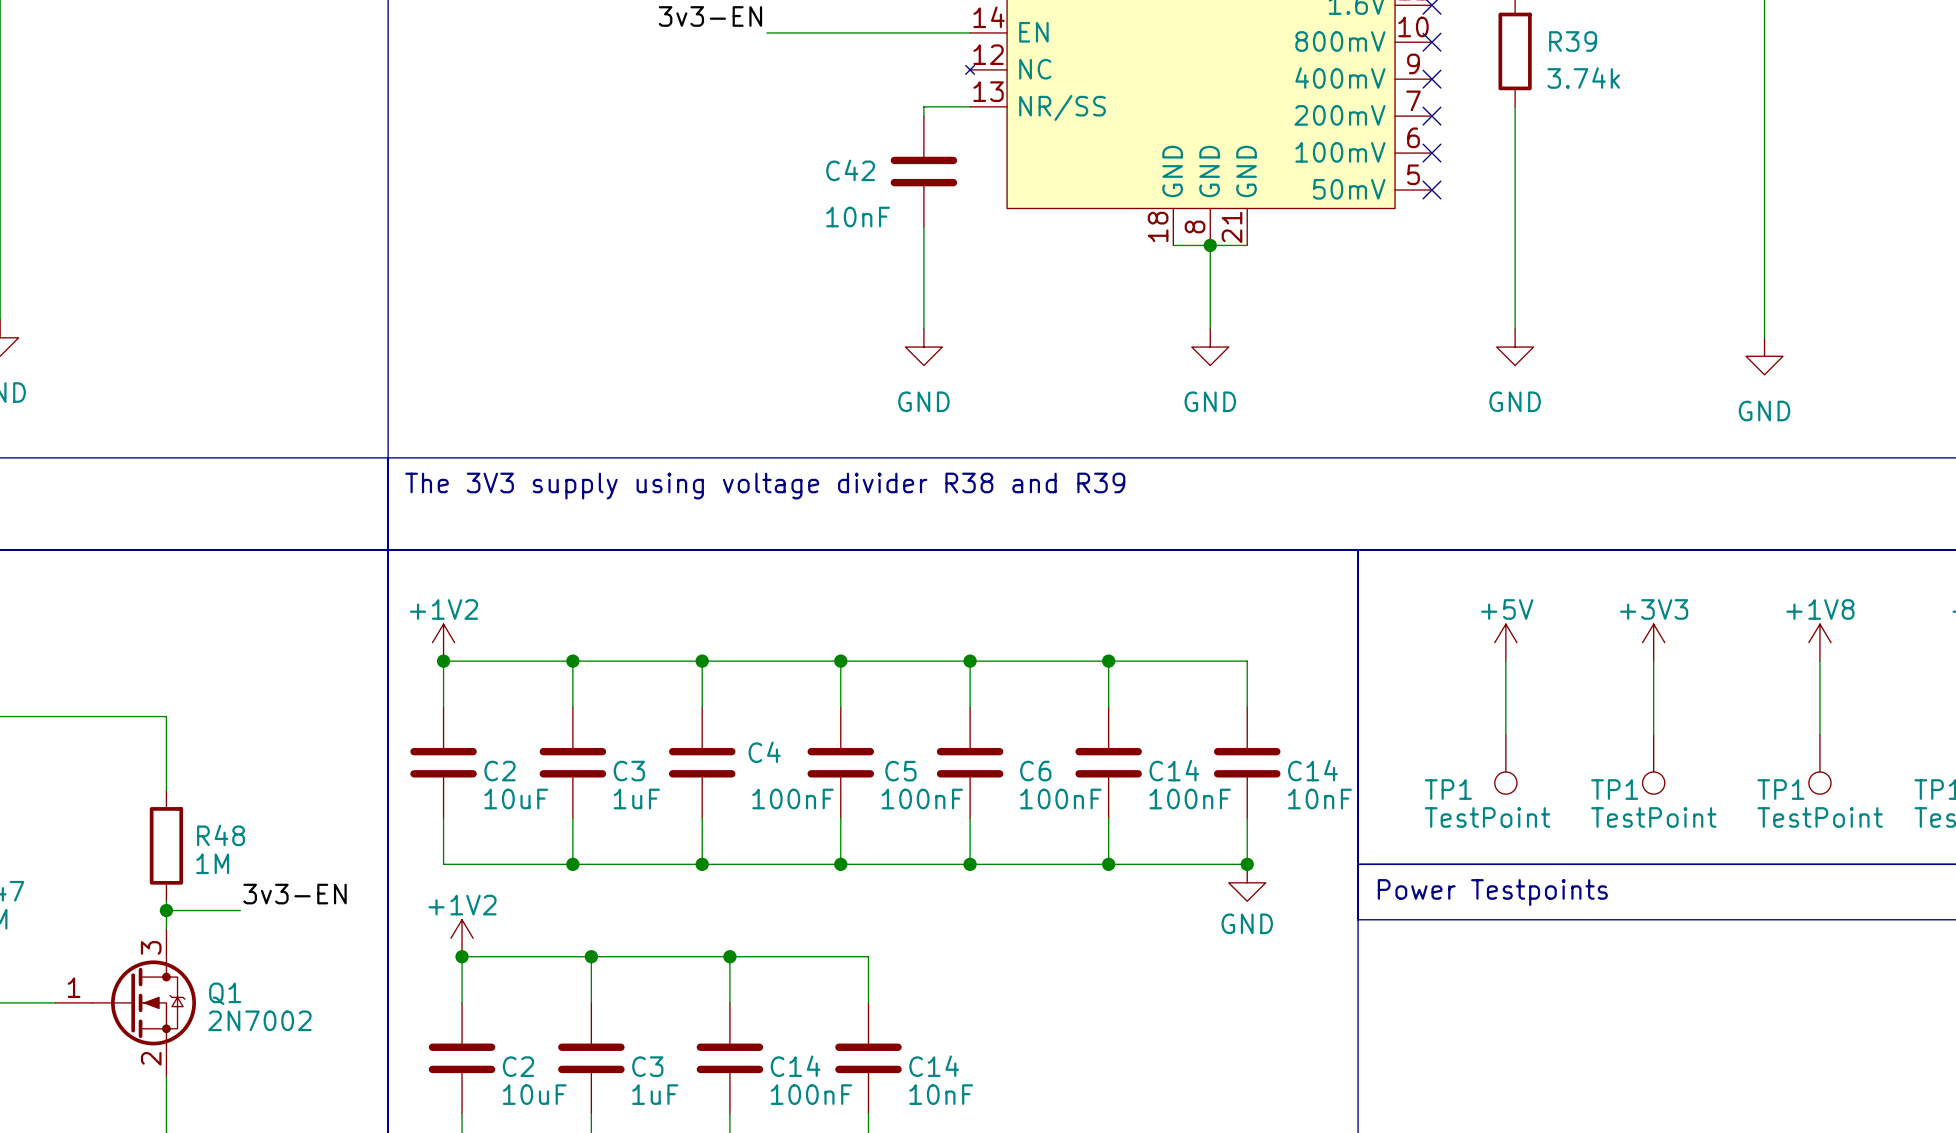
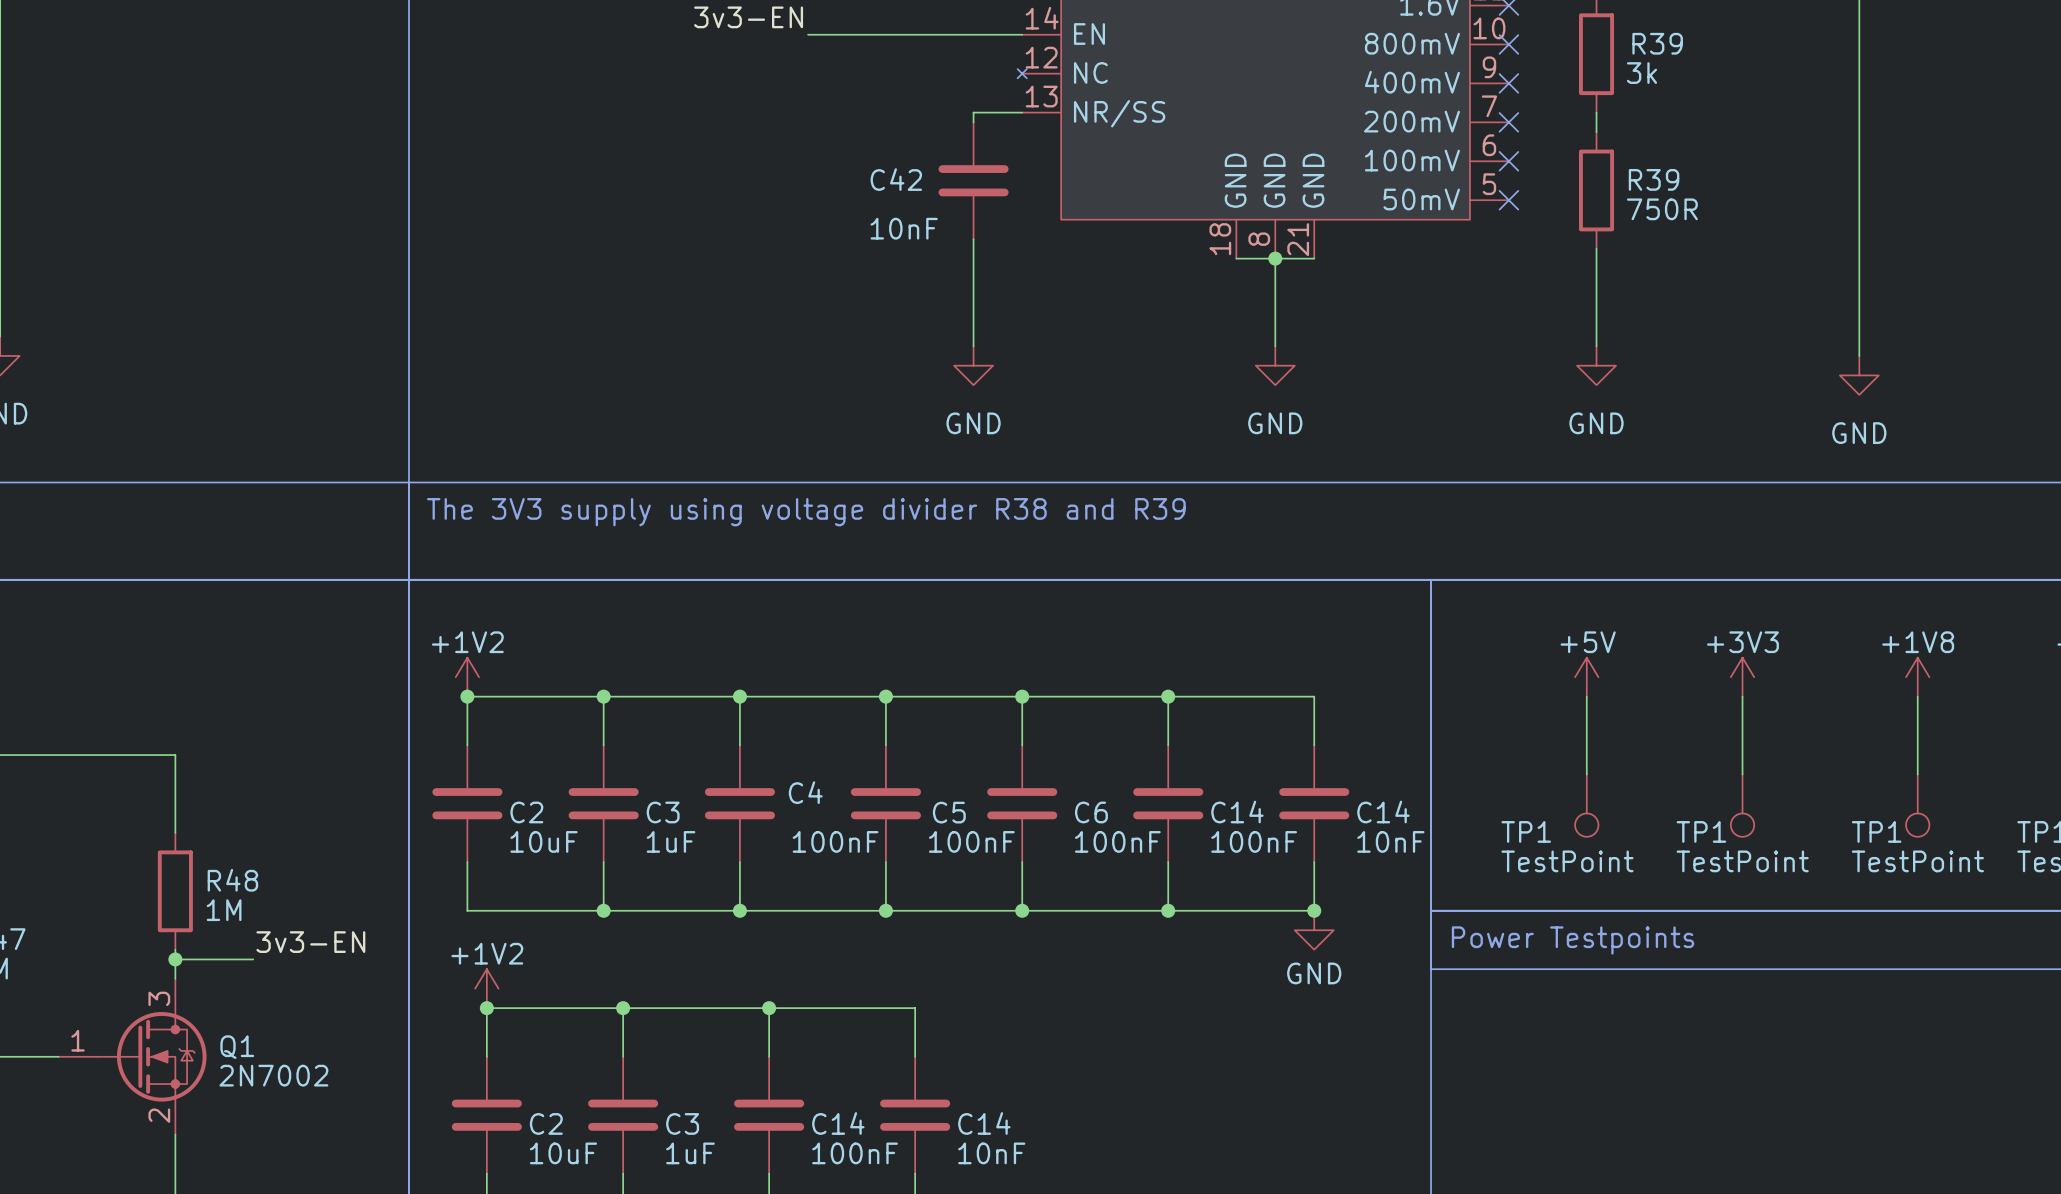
R39 value: 3.74k (1583, 78) -> 3k (1641, 73)
wire: (1515, 125) (1515, 236) -> none
R39: none -> 750R (1596, 190)

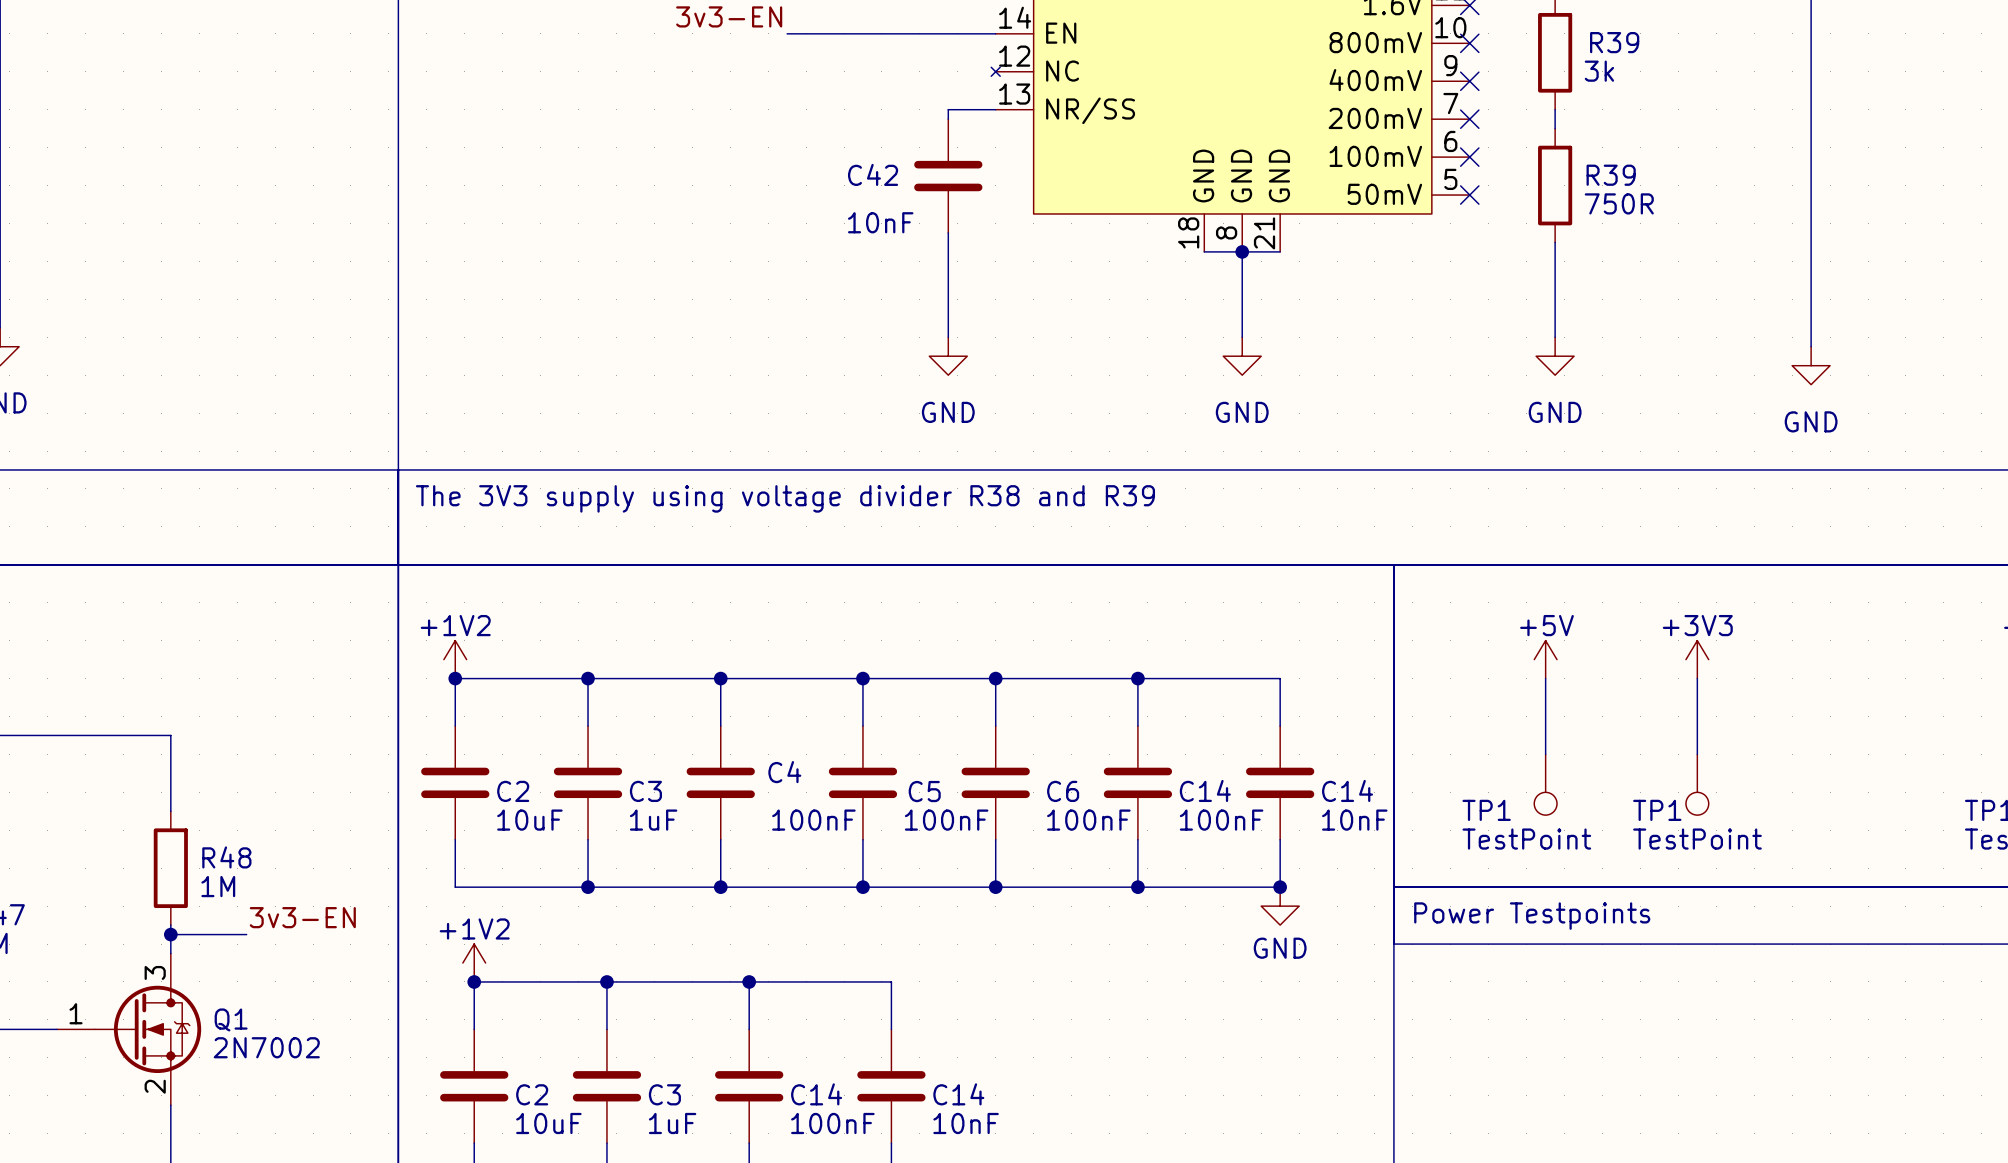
power symbol: +1V8 (1917, 677) -> none
wire: (1917, 696) (1917, 774) -> none
TP1: TestPoint (1917, 805) -> none

